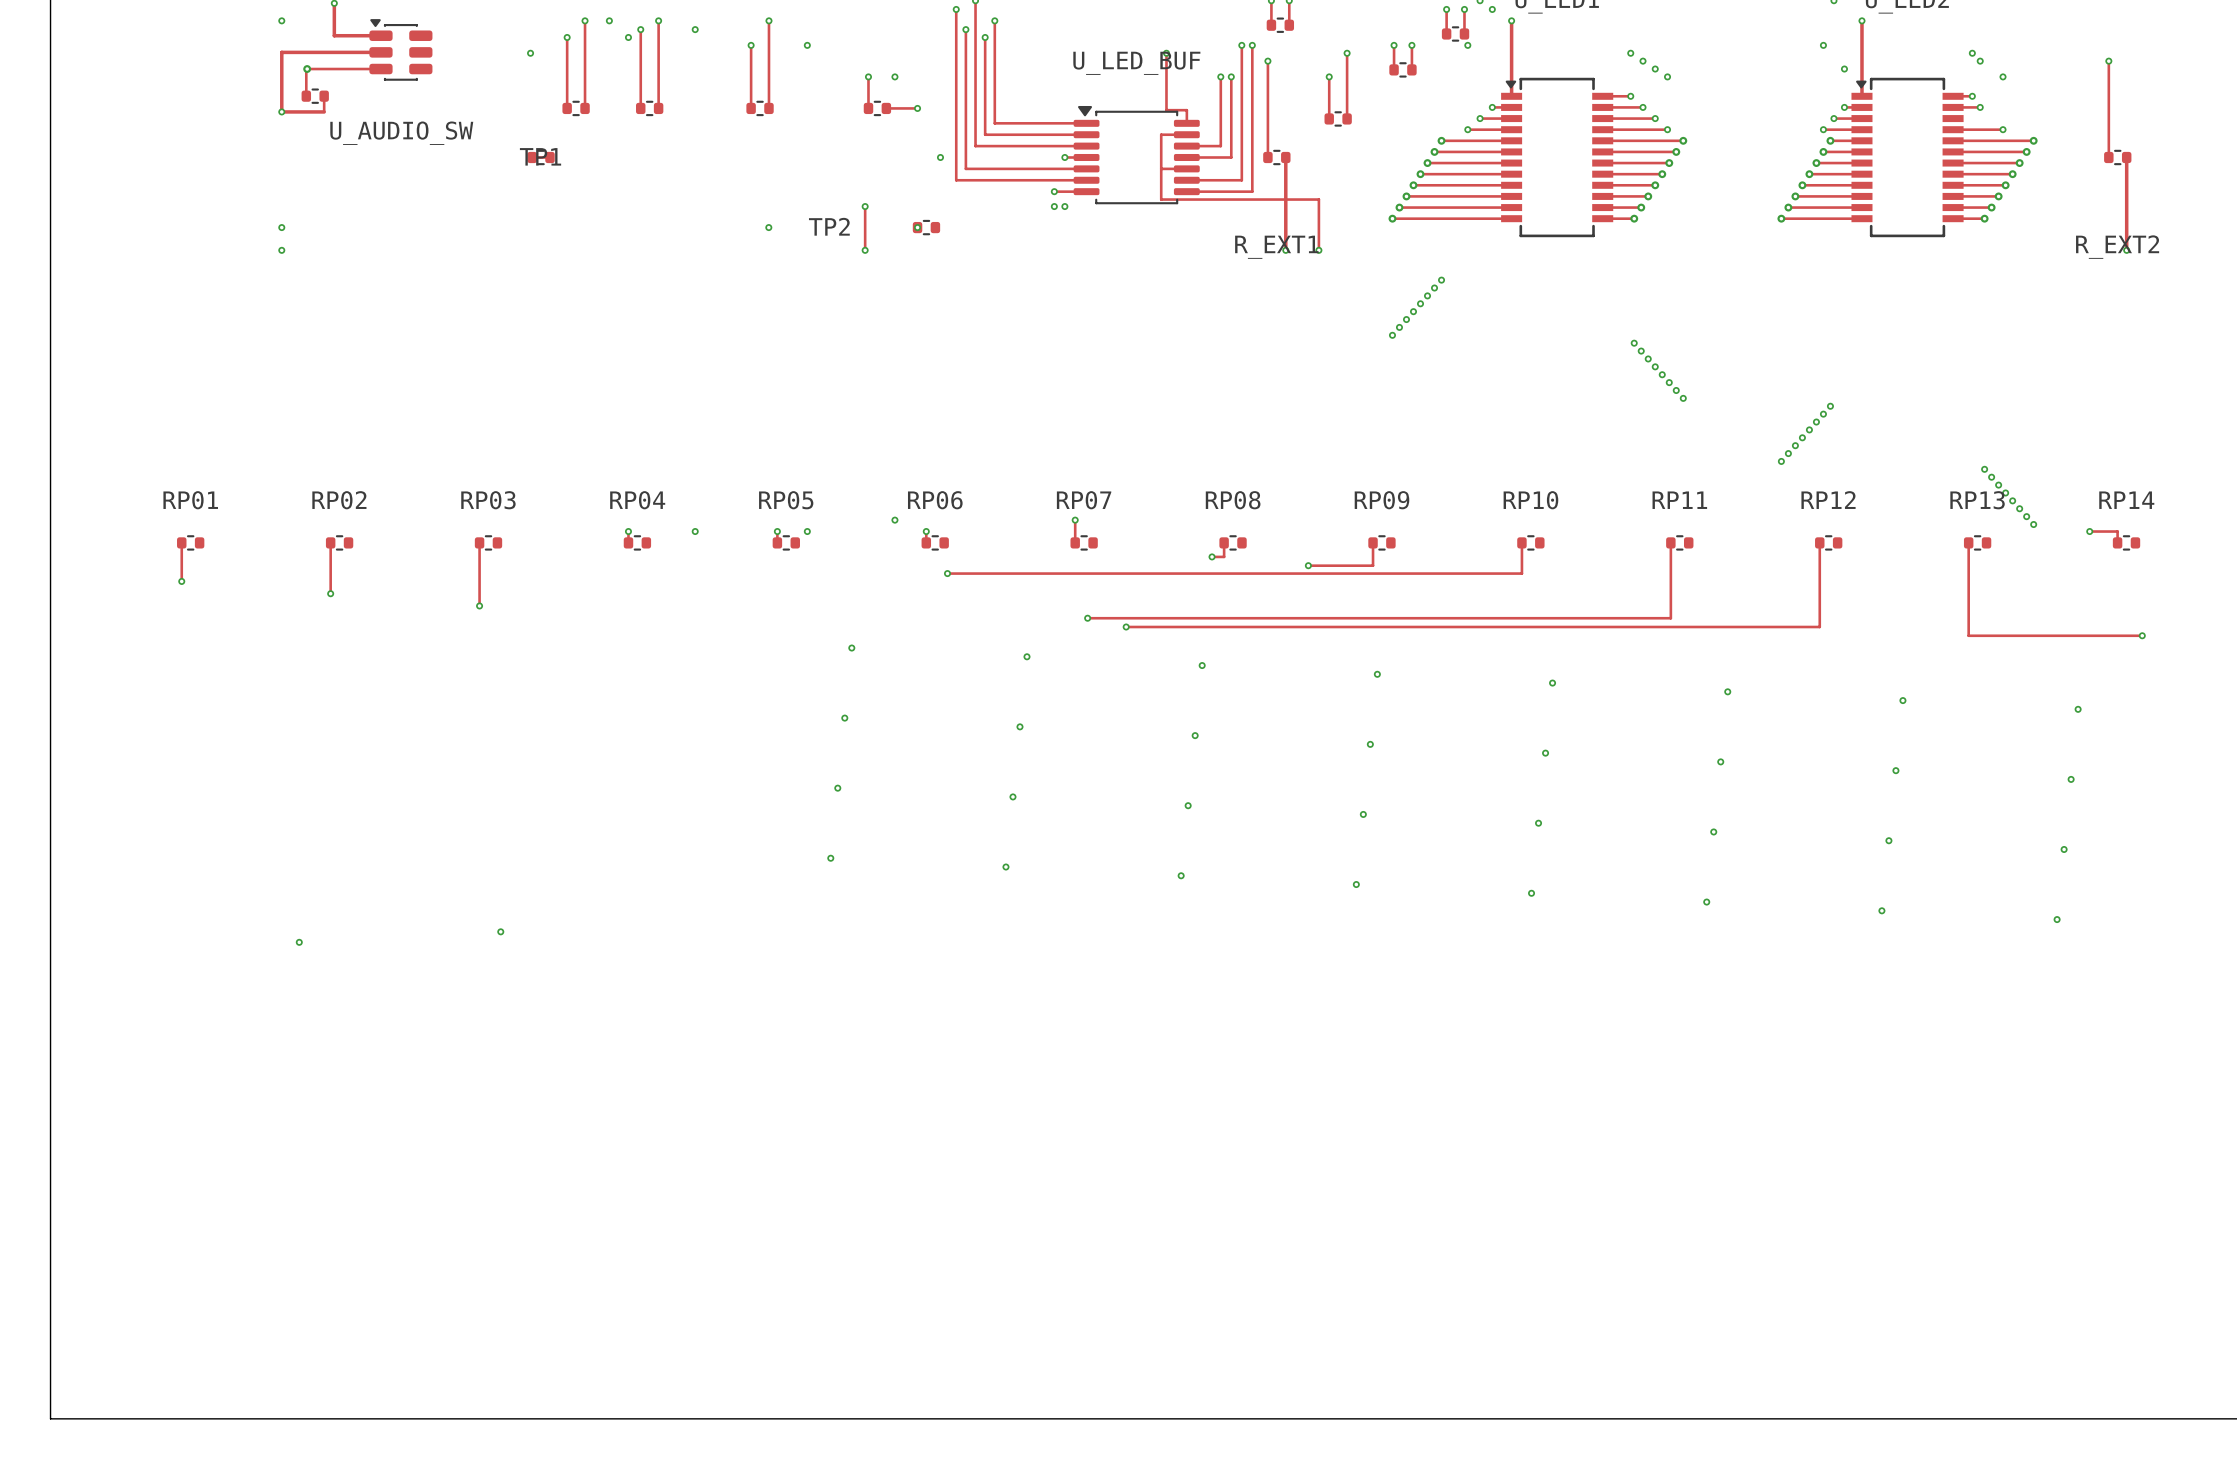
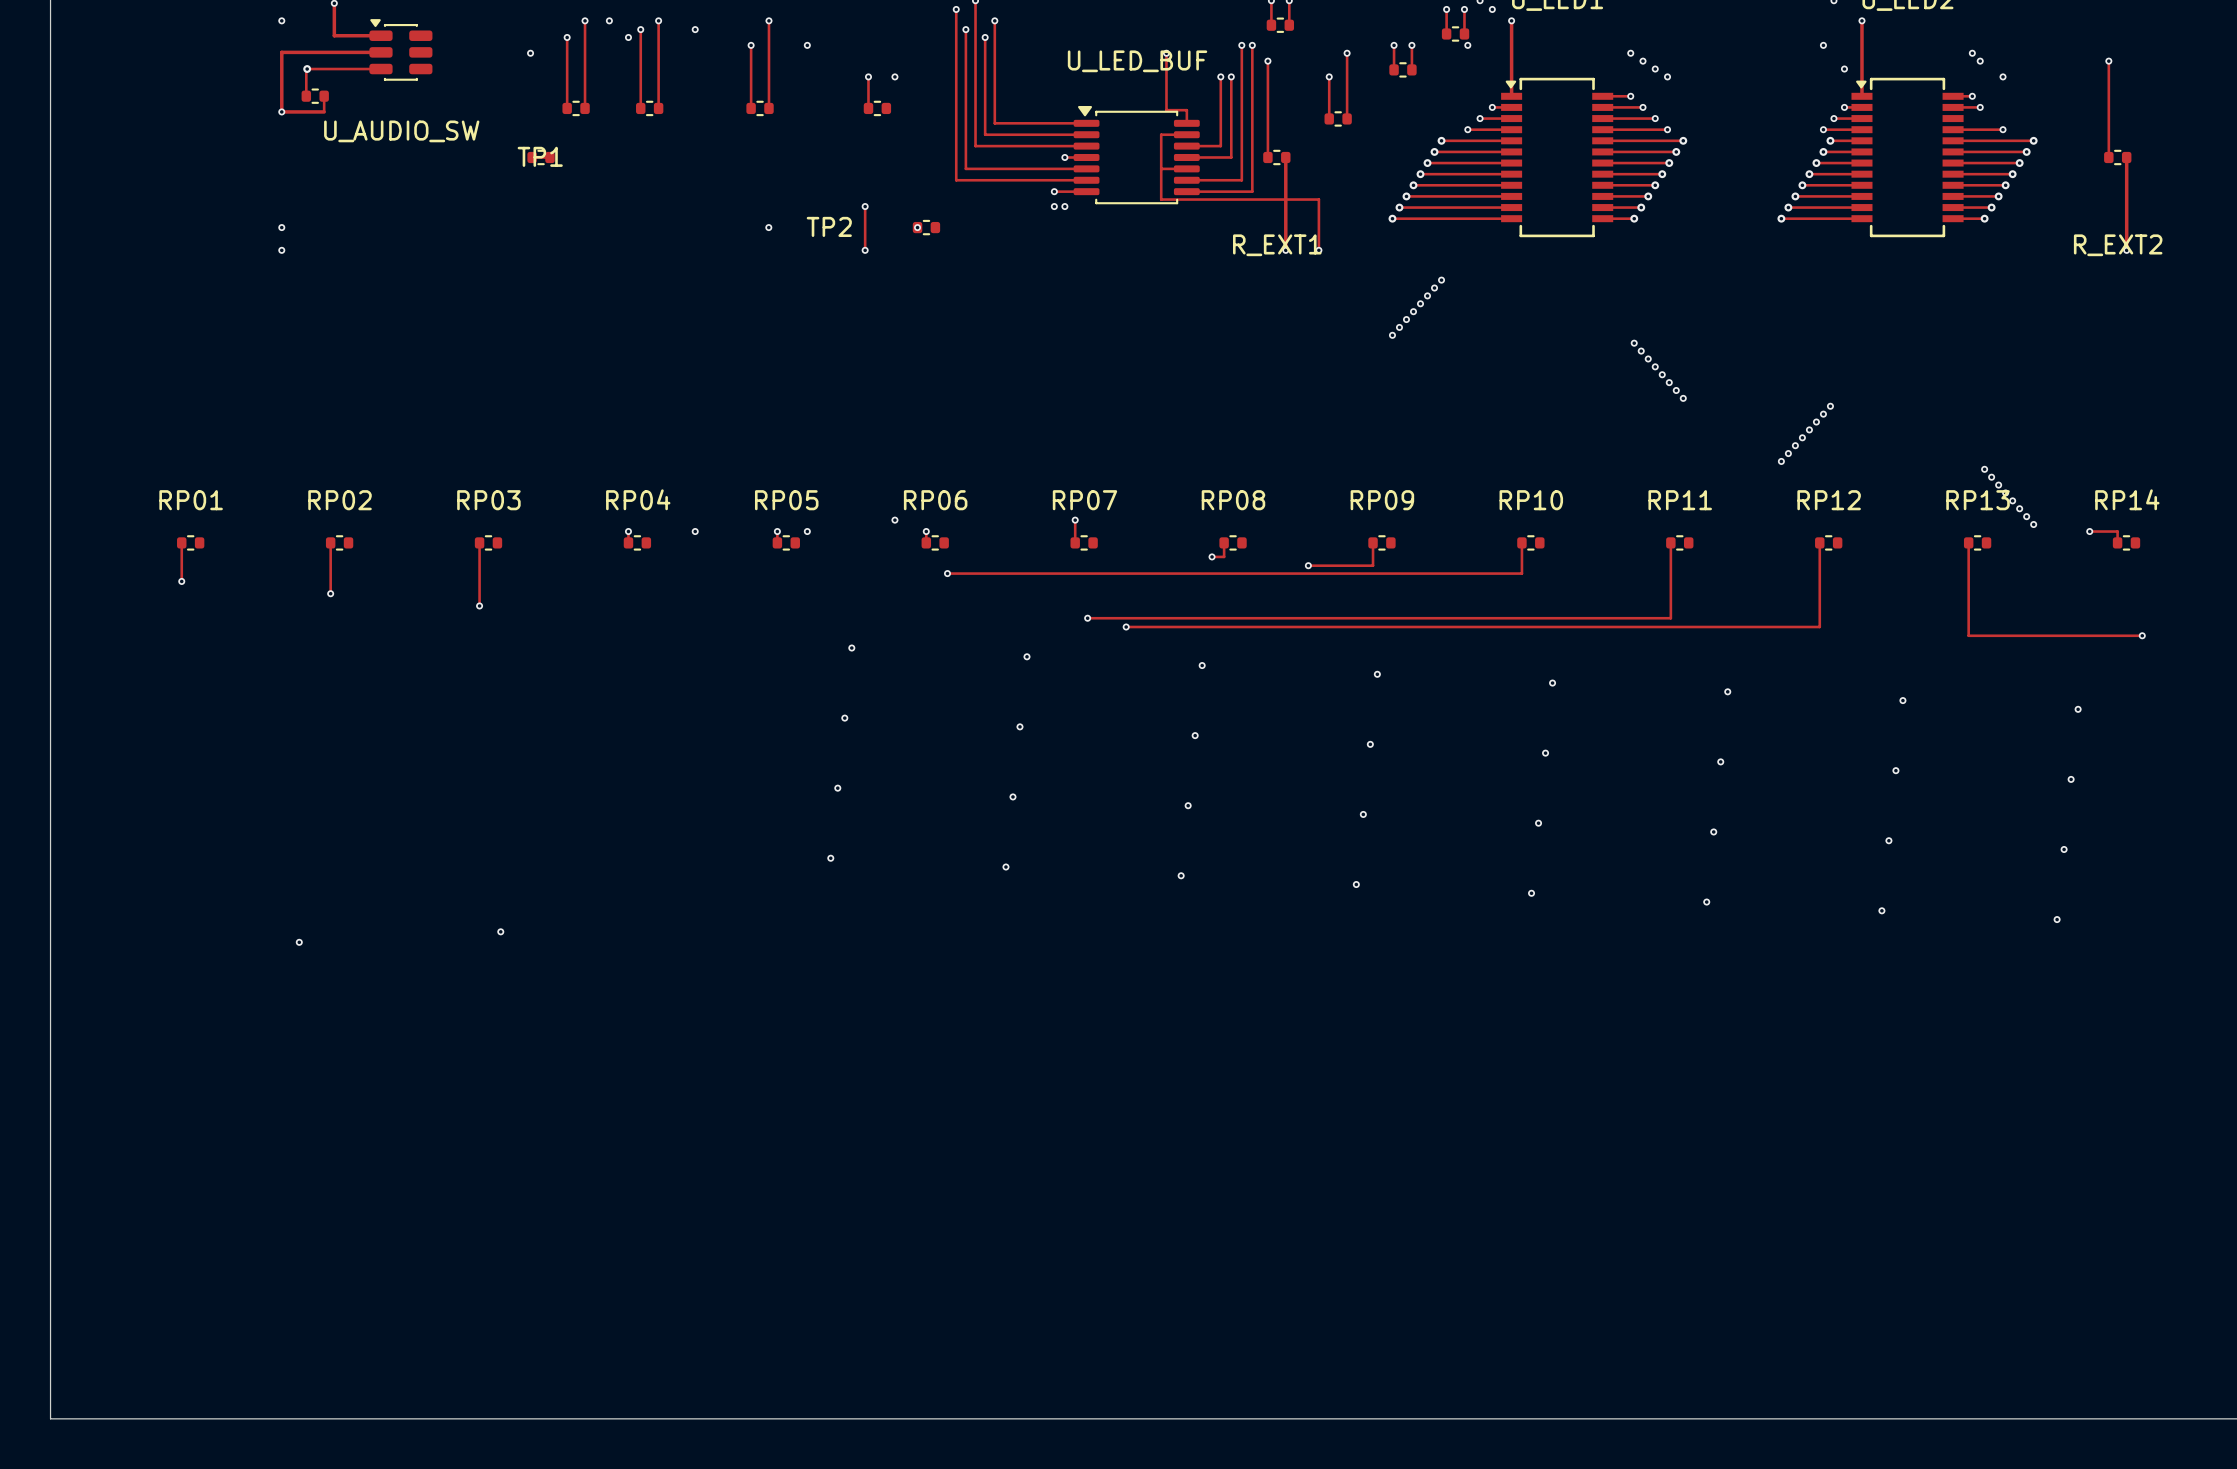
track: (886, 108) (917, 108) -> none
via: (917, 108) -> none
via: (940, 157) -> none

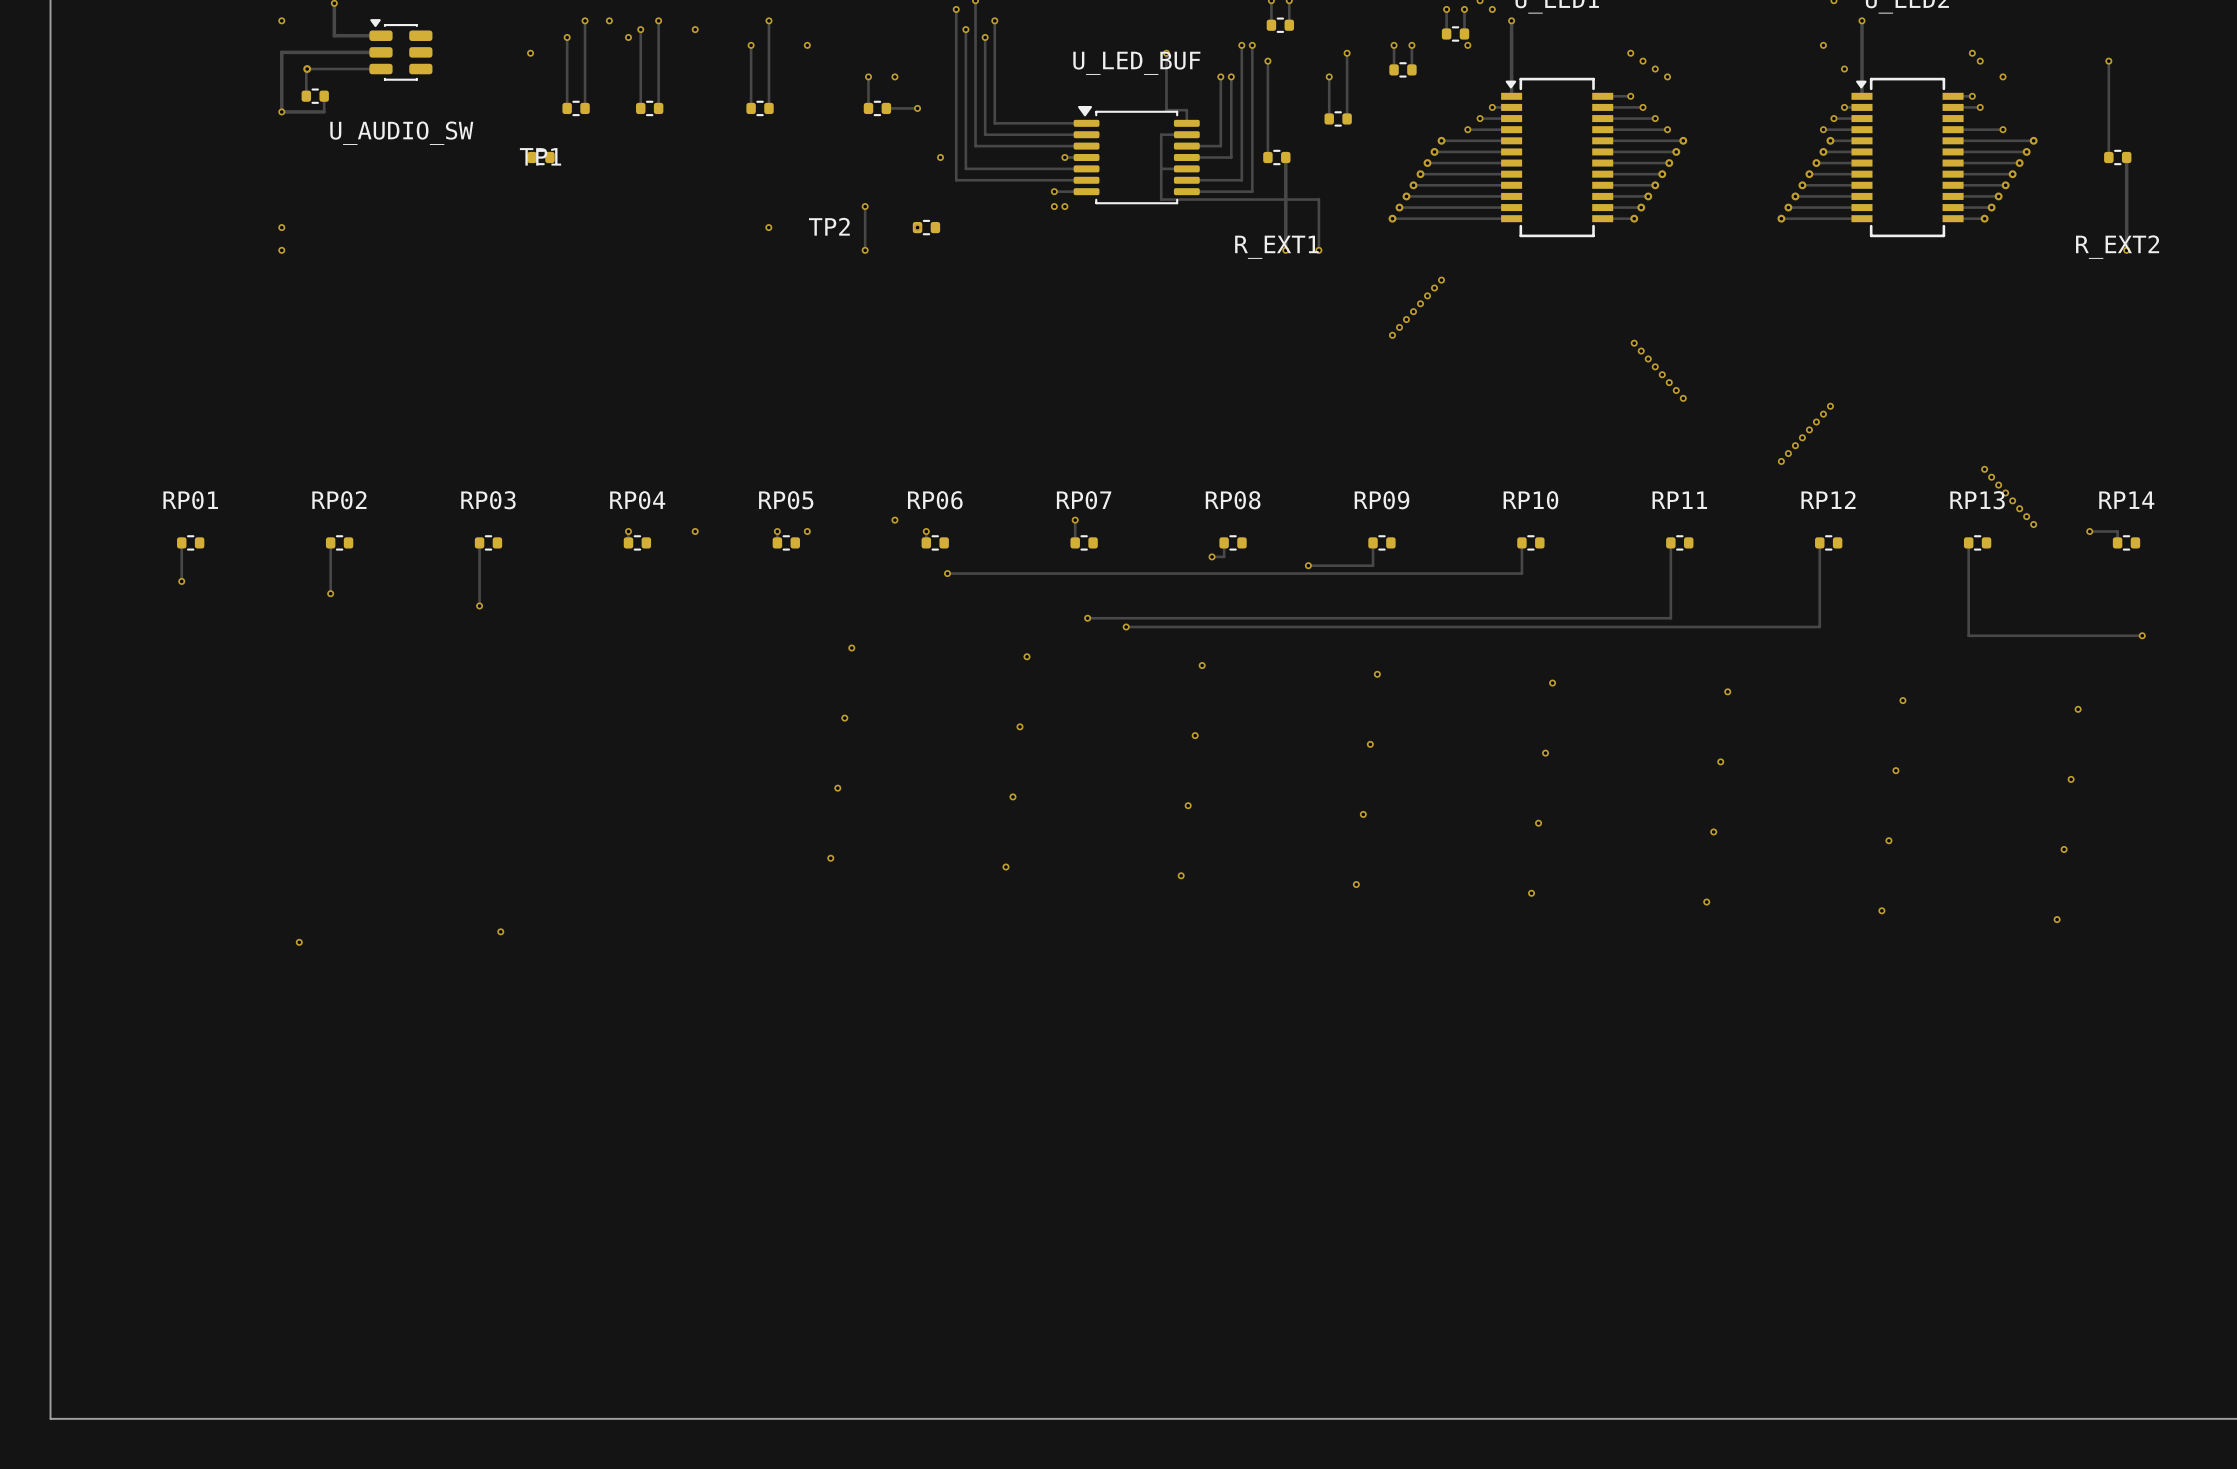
track: none -> (886, 108) (917, 108)
via: none -> (917, 108)
via: none -> (940, 157)

